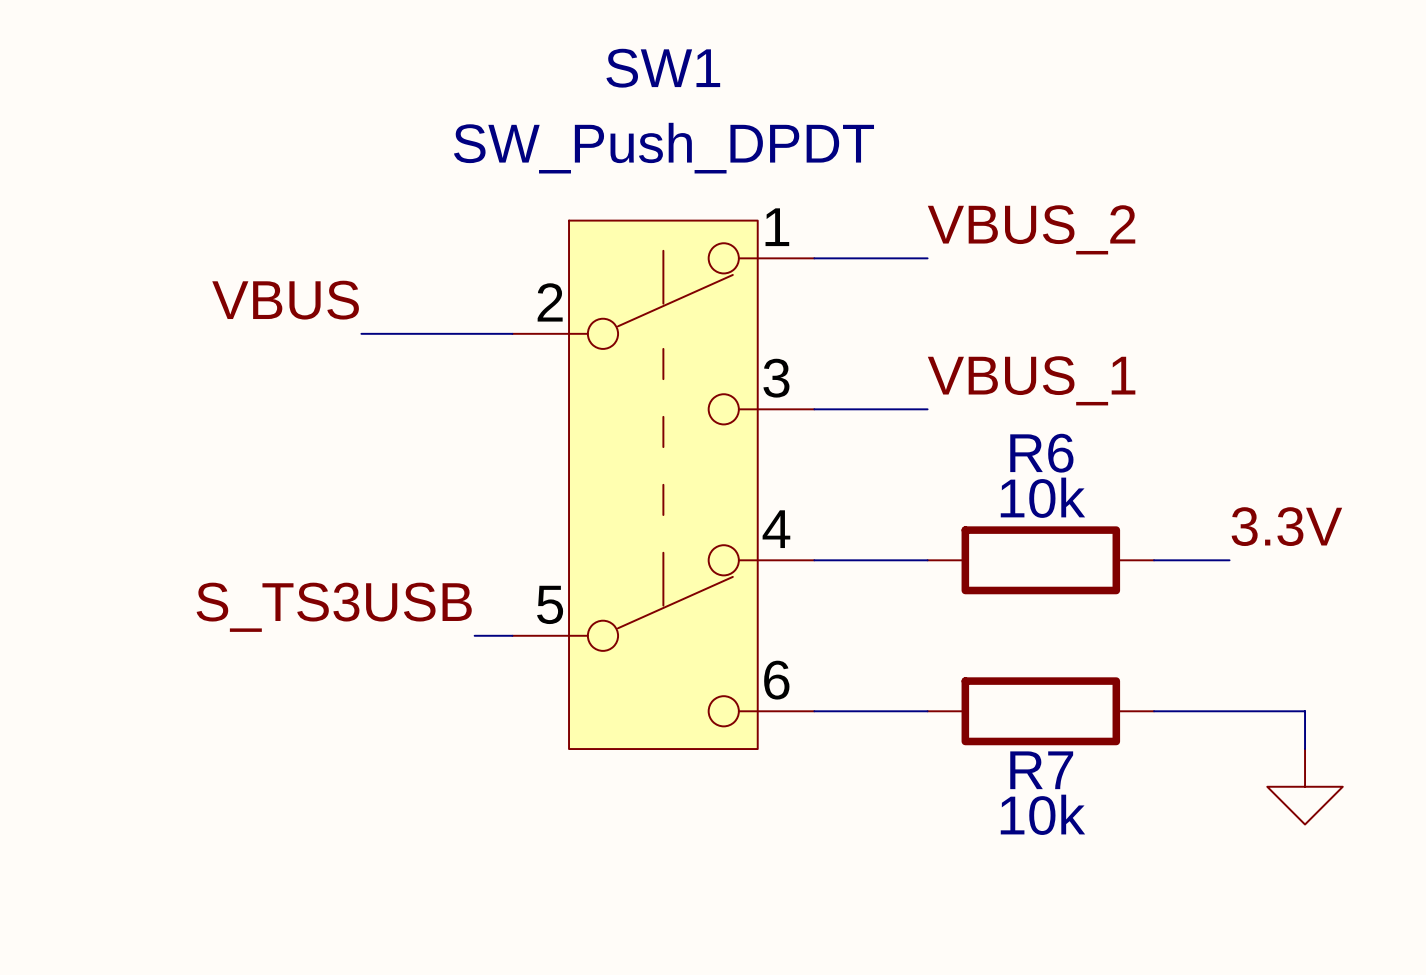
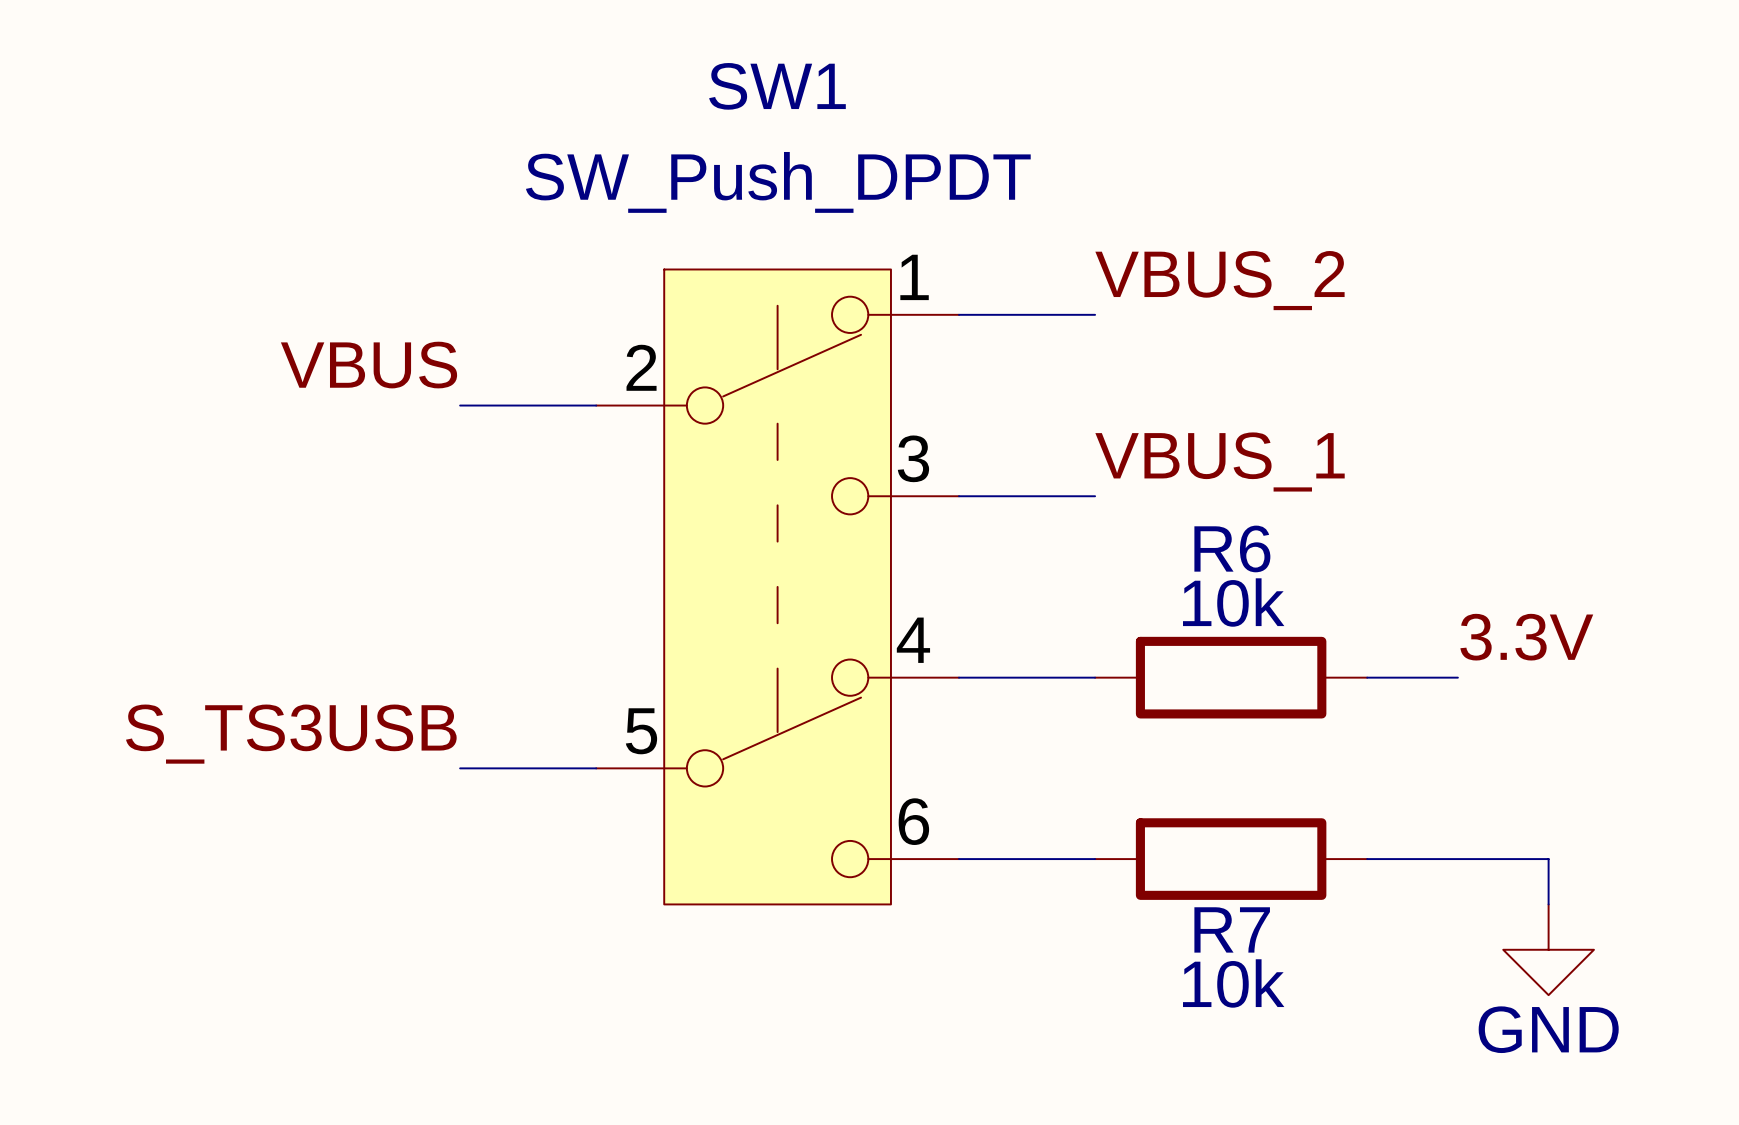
label position: VBUS (285, 300) -> VBUS (368, 365)
wire: (361, 333) (399, 333) -> none
label position: S_TS3USB (334, 607) -> S_TS3USB (291, 734)
wire: none -> (460, 768) (550, 768)
power symbol text: none -> GND (1548, 1029)

